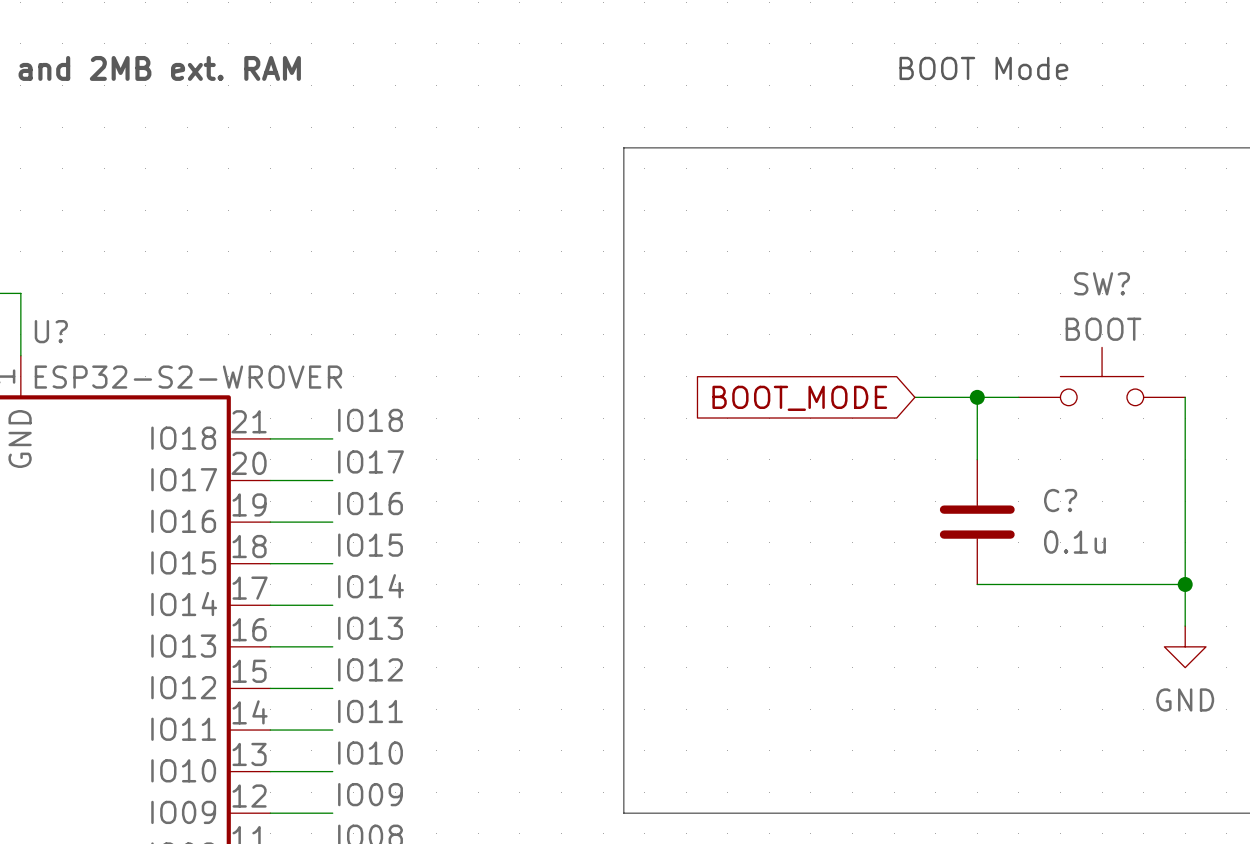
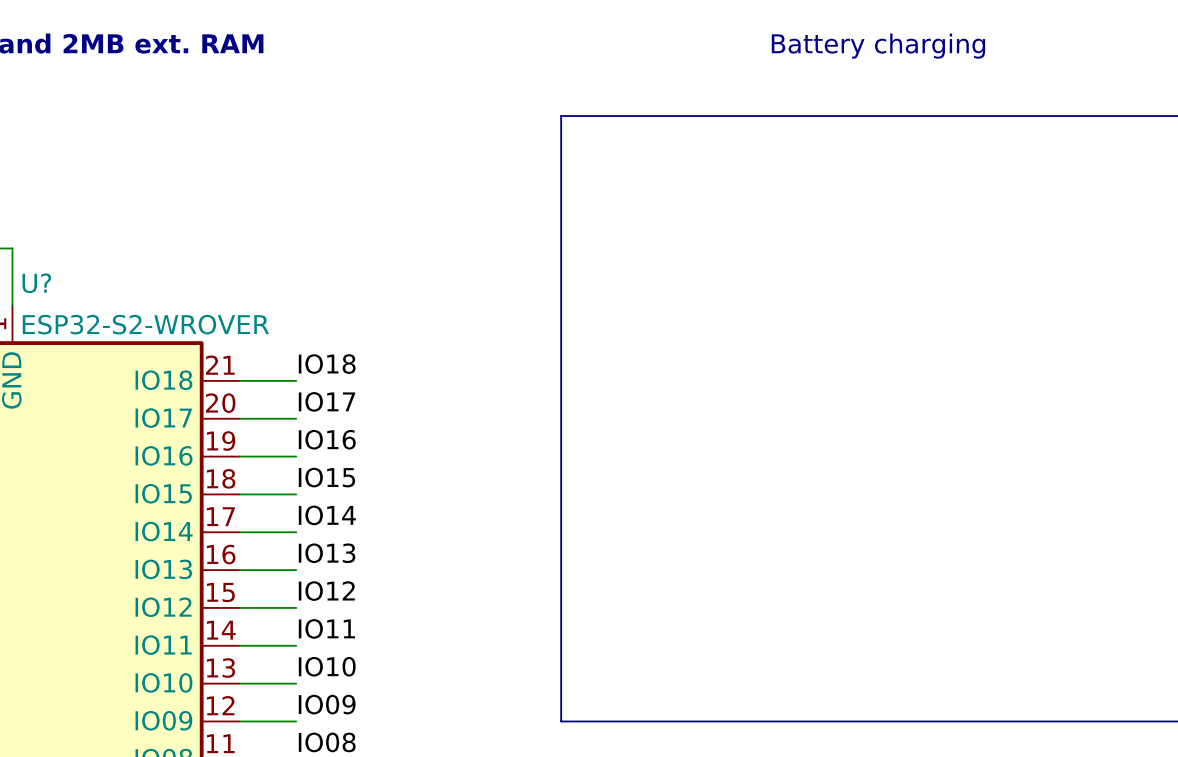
text: BOOT Mode (983, 68) -> none
text: none -> Battery charging (878, 46)
SW?: BOOT (1102, 376) -> none
wire: (914, 397) (1018, 397) -> none
wire: (977, 397) (977, 459) -> none
junction: (977, 397) -> none
wire: (1185, 397) (1185, 626) -> none
global label: BOOT_MODE (799, 398) -> none
C?: 0.1u (977, 522) -> none
wire: (977, 584) (1185, 584) -> none
junction: (1185, 584) -> none
power symbol: GND (1185, 646) -> none

